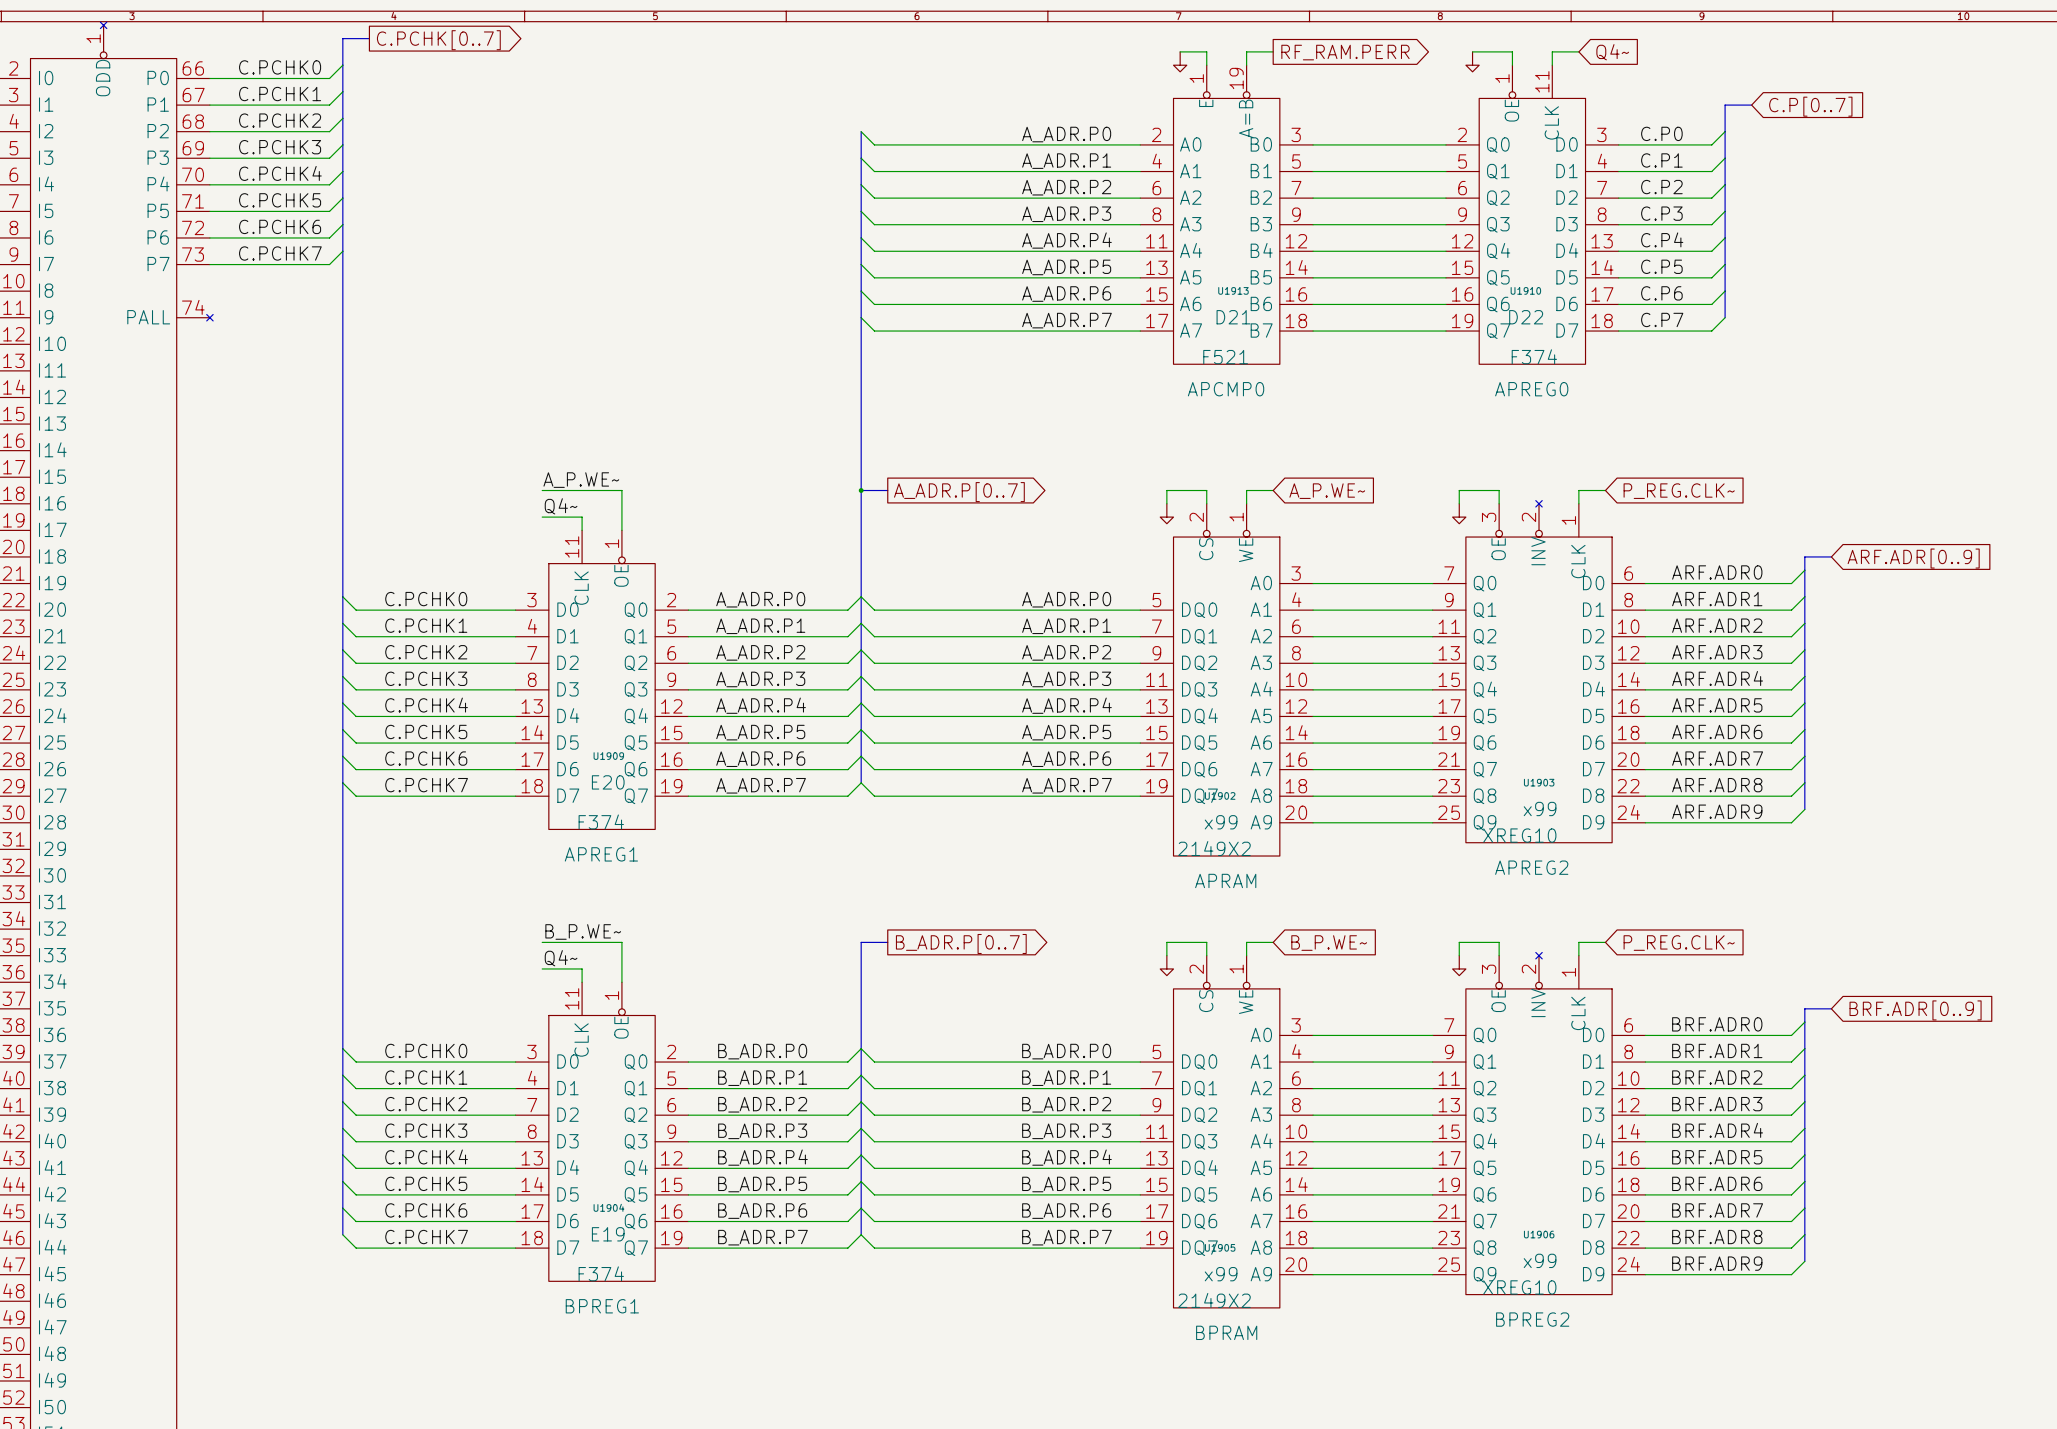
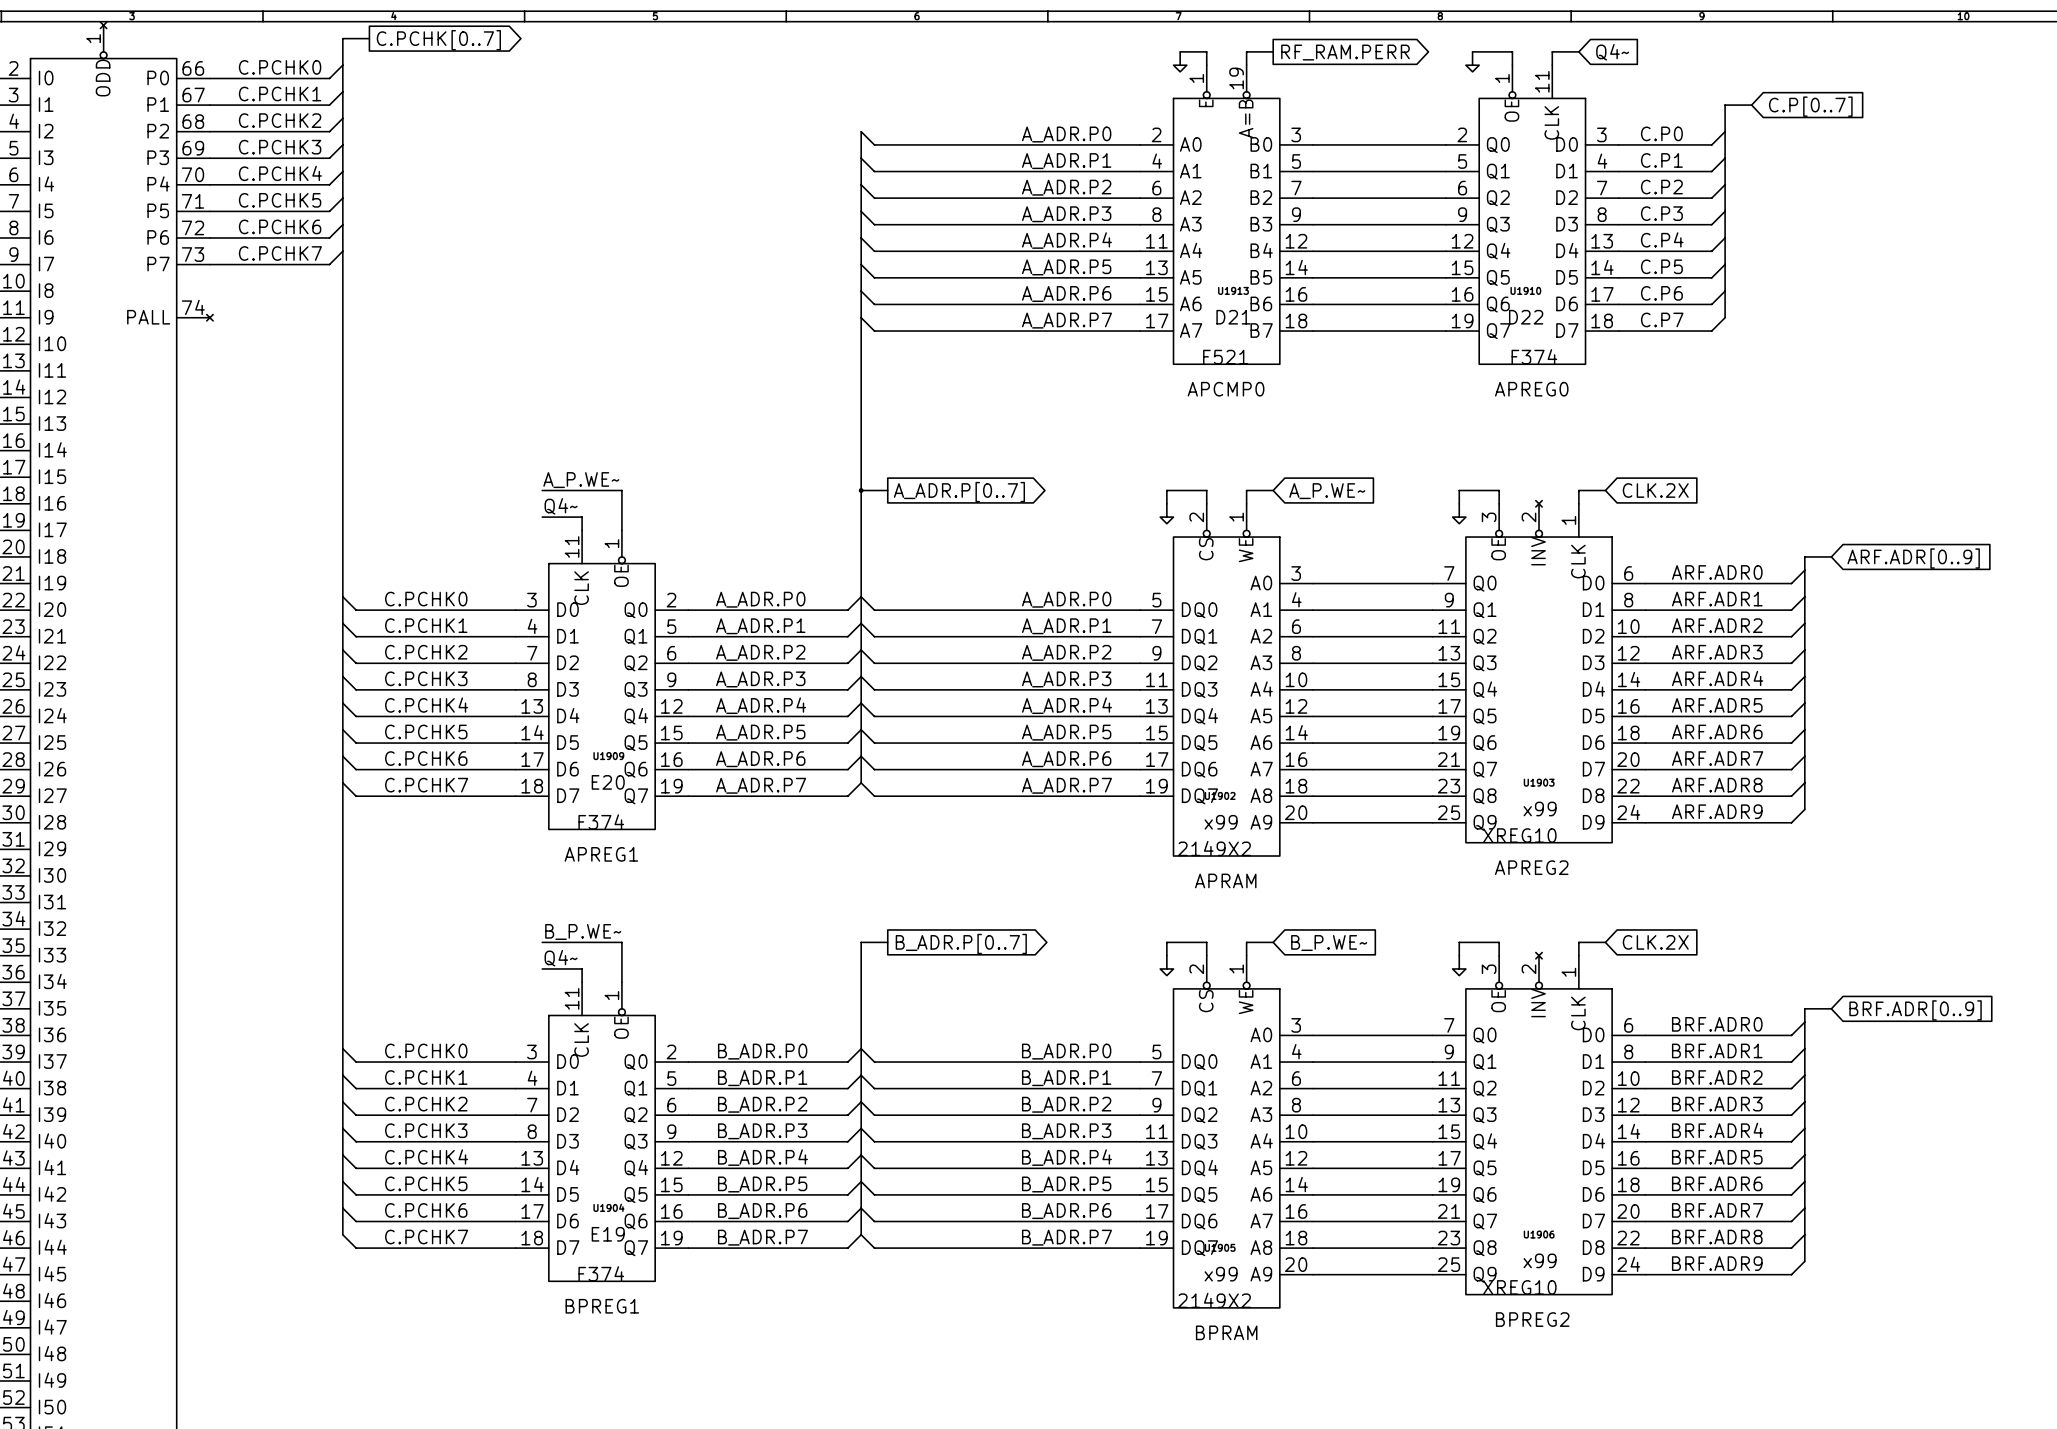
global label: P_REG.CLK~ (1679, 491) -> CLK.2X (1655, 490)
global label: P_REG.CLK~ (1679, 943) -> CLK.2X (1655, 942)

